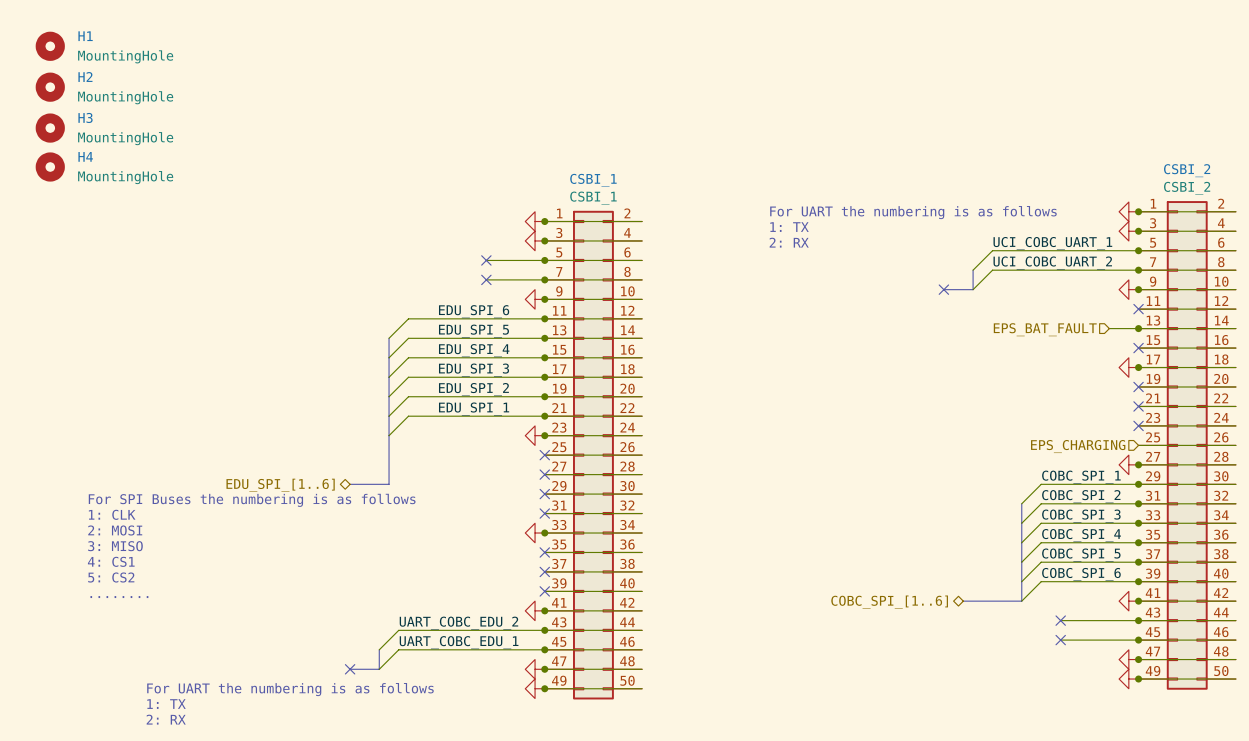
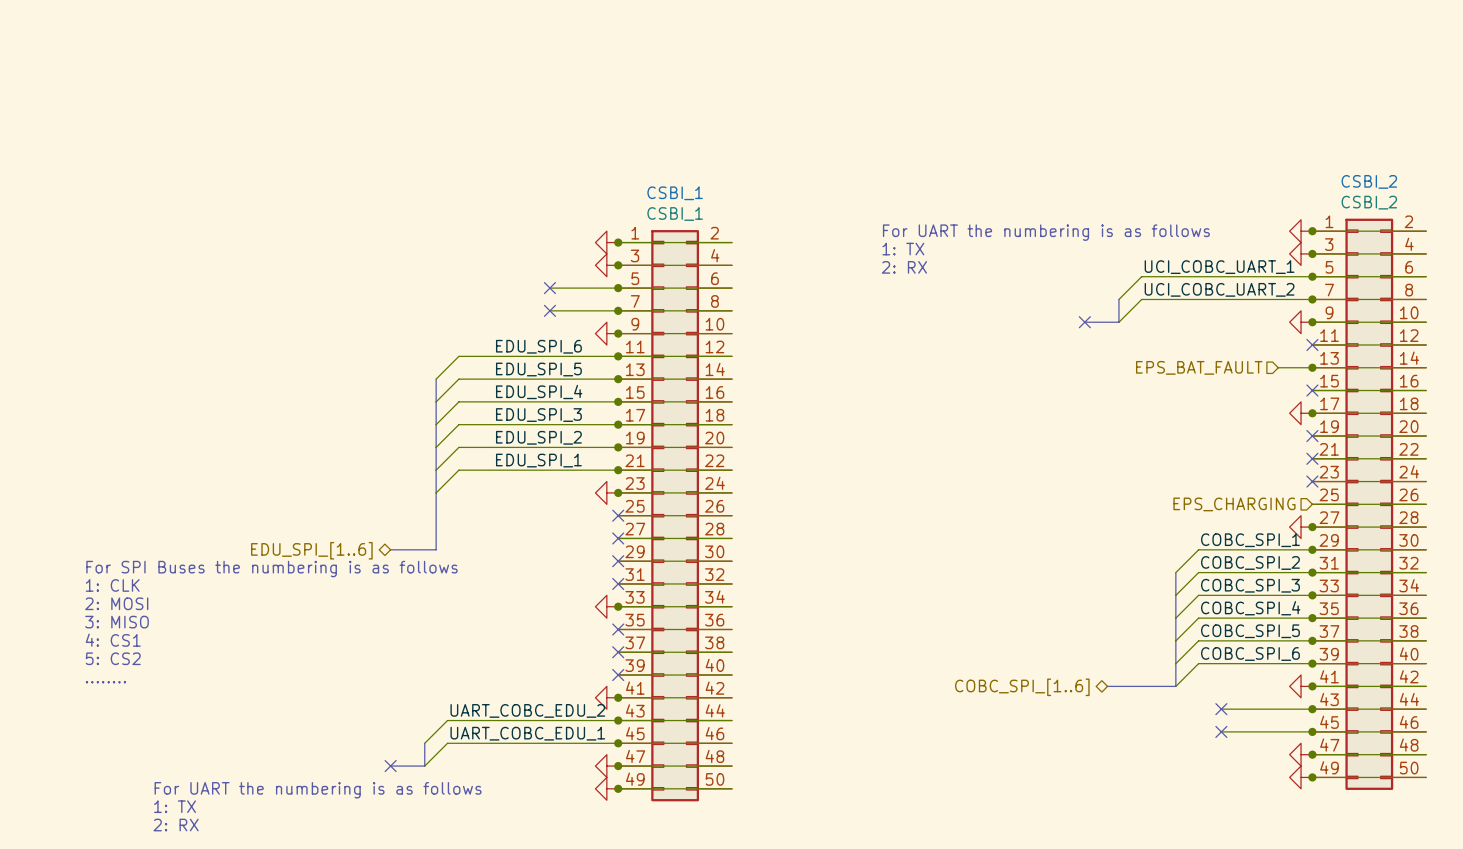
H1: MountingHole (50, 46) -> none
H2: MountingHole (50, 87) -> none
H3: MountingHole (50, 128) -> none
H4: MountingHole (50, 167) -> none

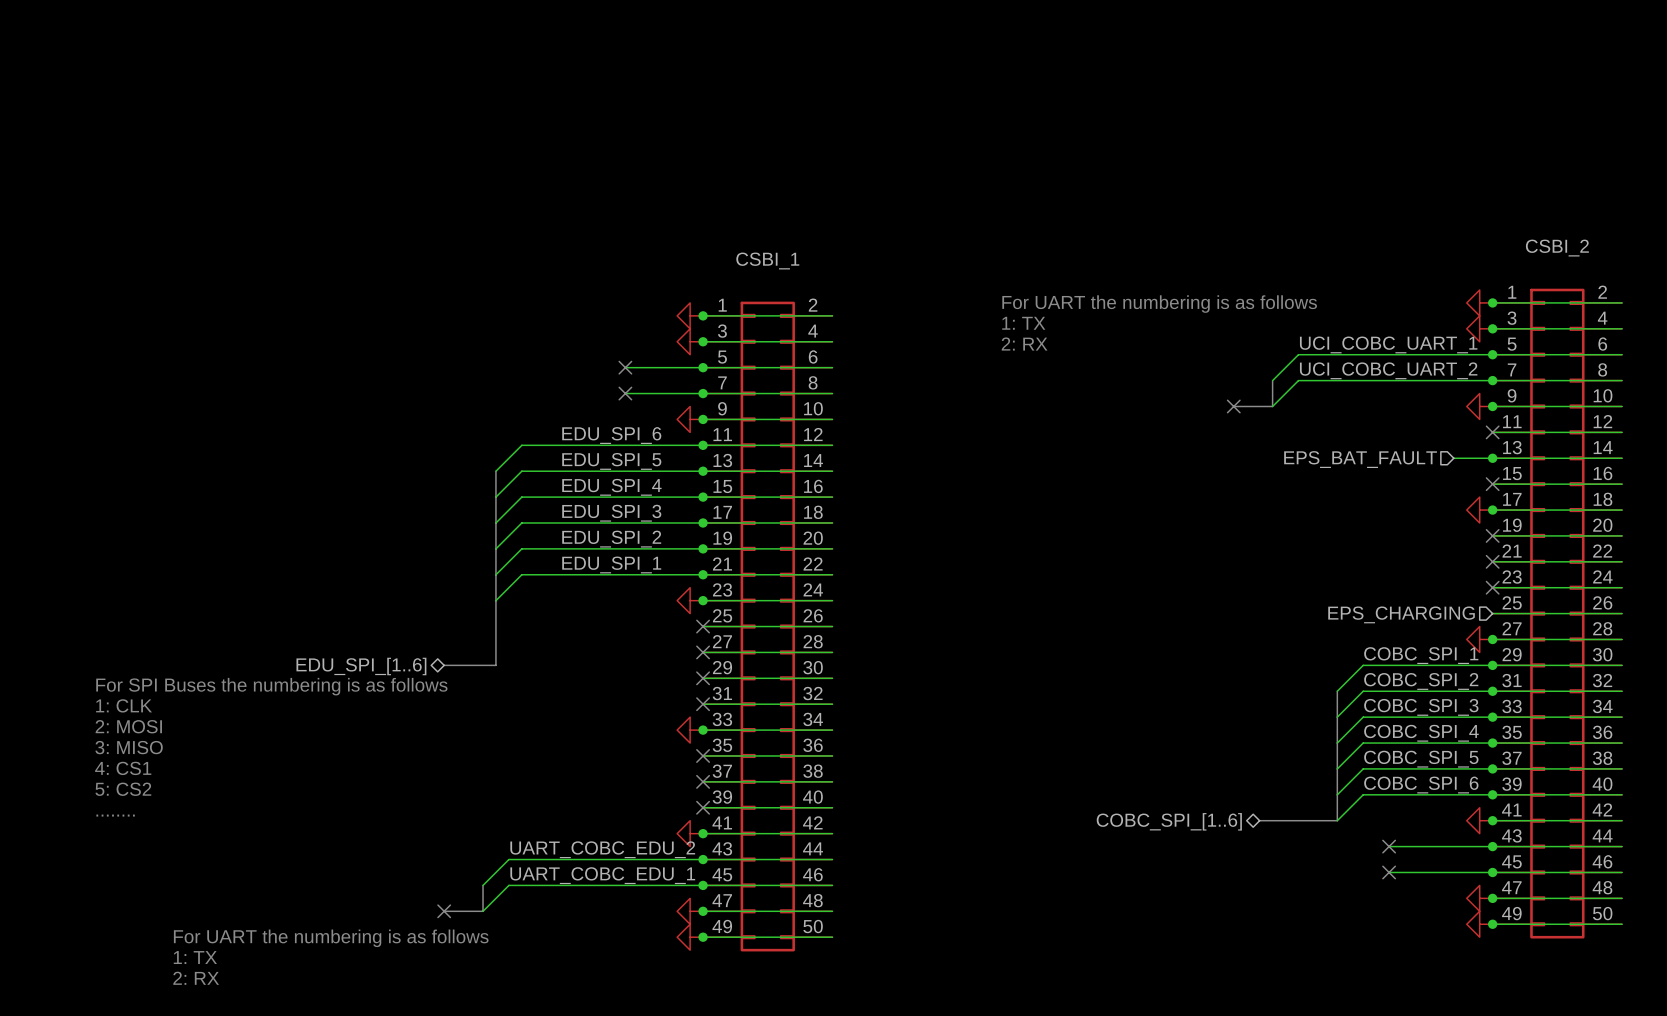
CSBI_2 value: CSBI_2 (1369, 202) -> none
CSBI_1 value: CSBI_1 (675, 214) -> none

